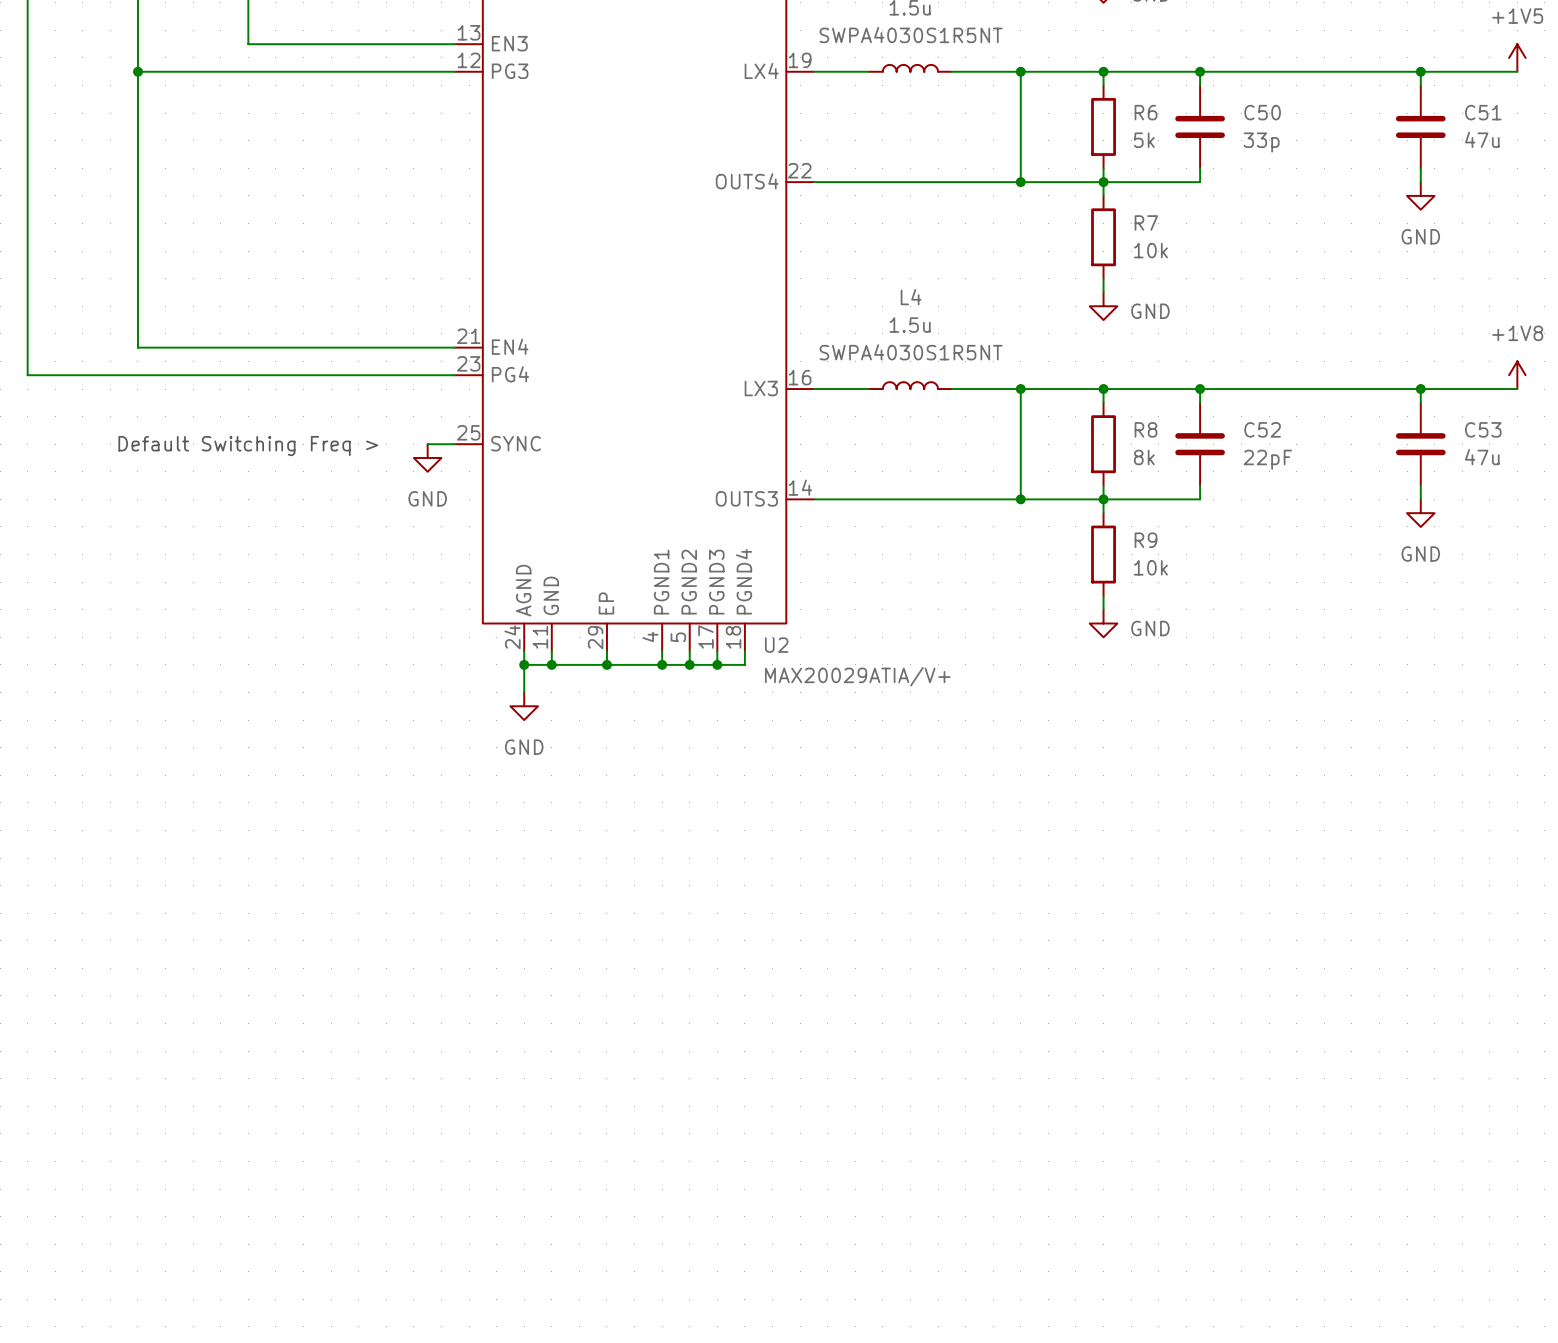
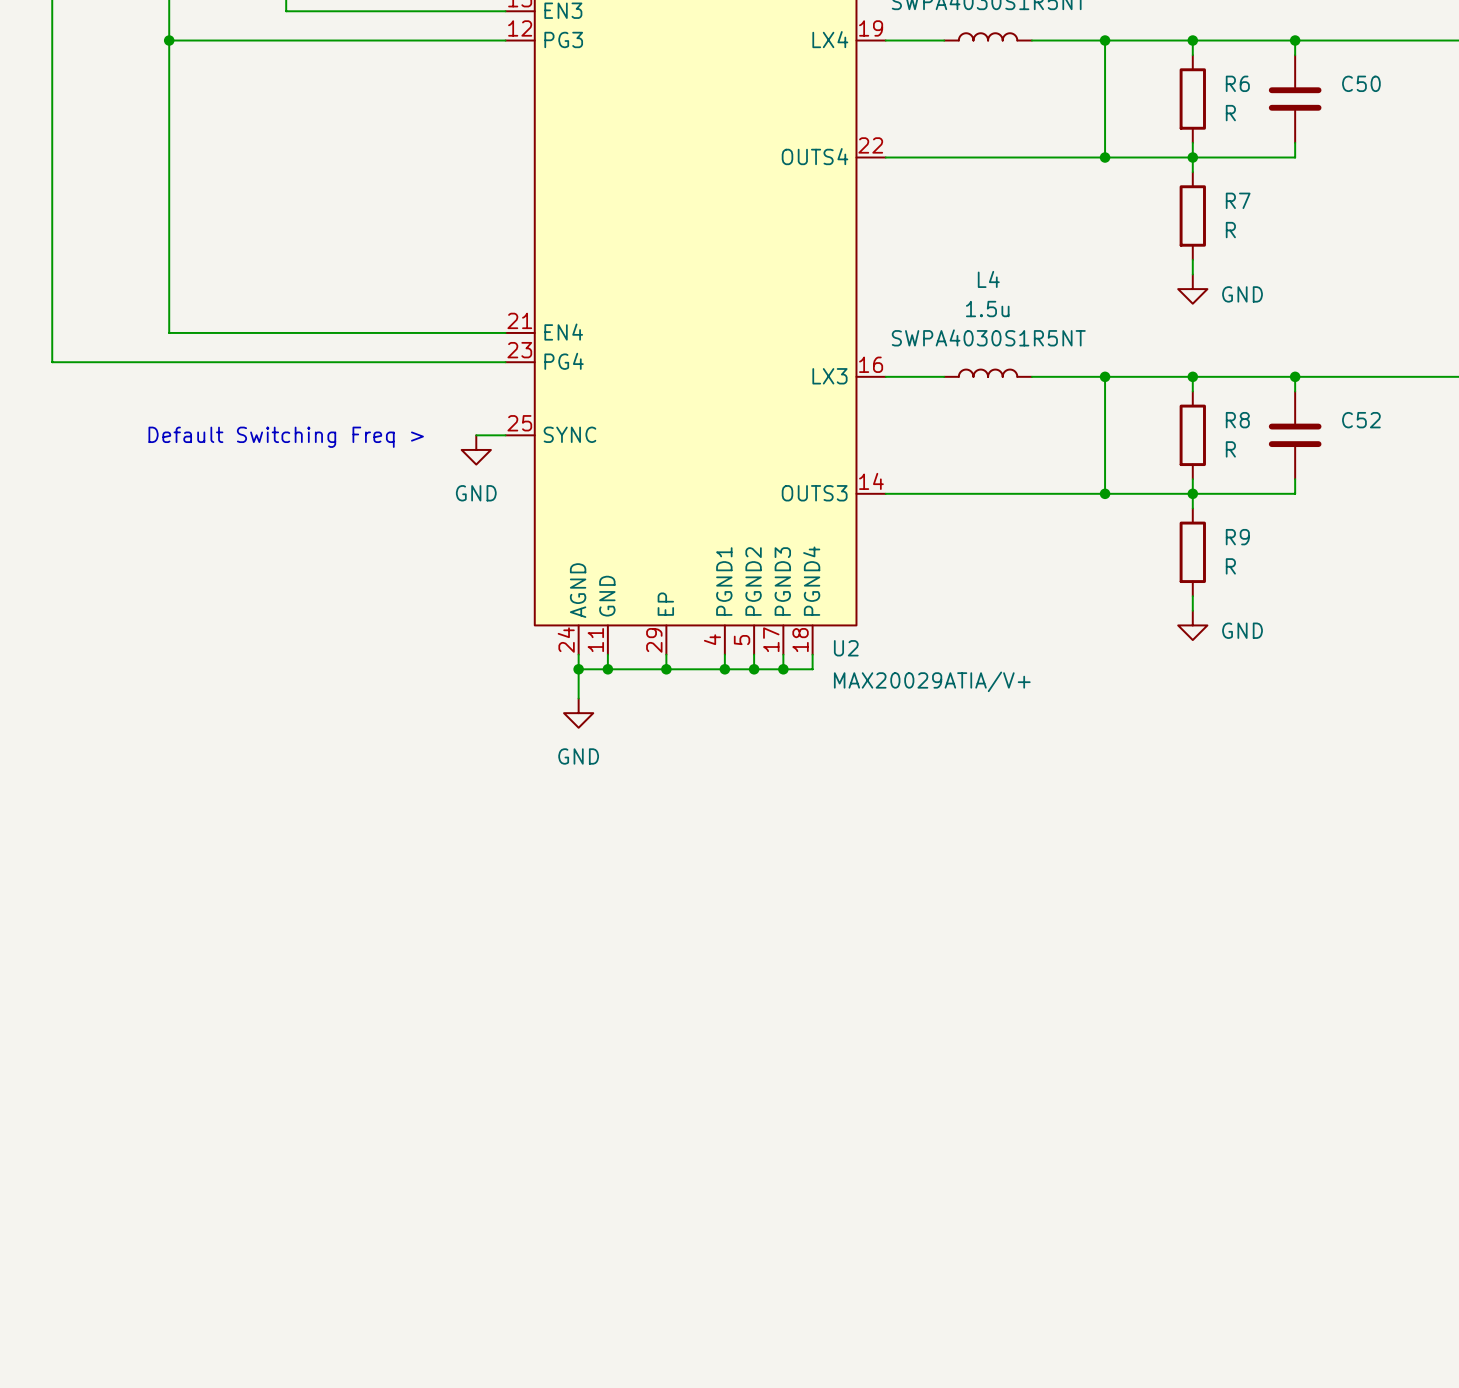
R6 value: 5k (1144, 140) -> R (1230, 113)
C50 value: 33p (1261, 142) -> none
R7 value: 10k (1150, 250) -> R (1230, 230)
R8 value: 8k (1144, 457) -> R (1230, 449)
C52 value: 22pF (1267, 459) -> none
R9 value: 10k (1150, 567) -> R (1230, 566)

